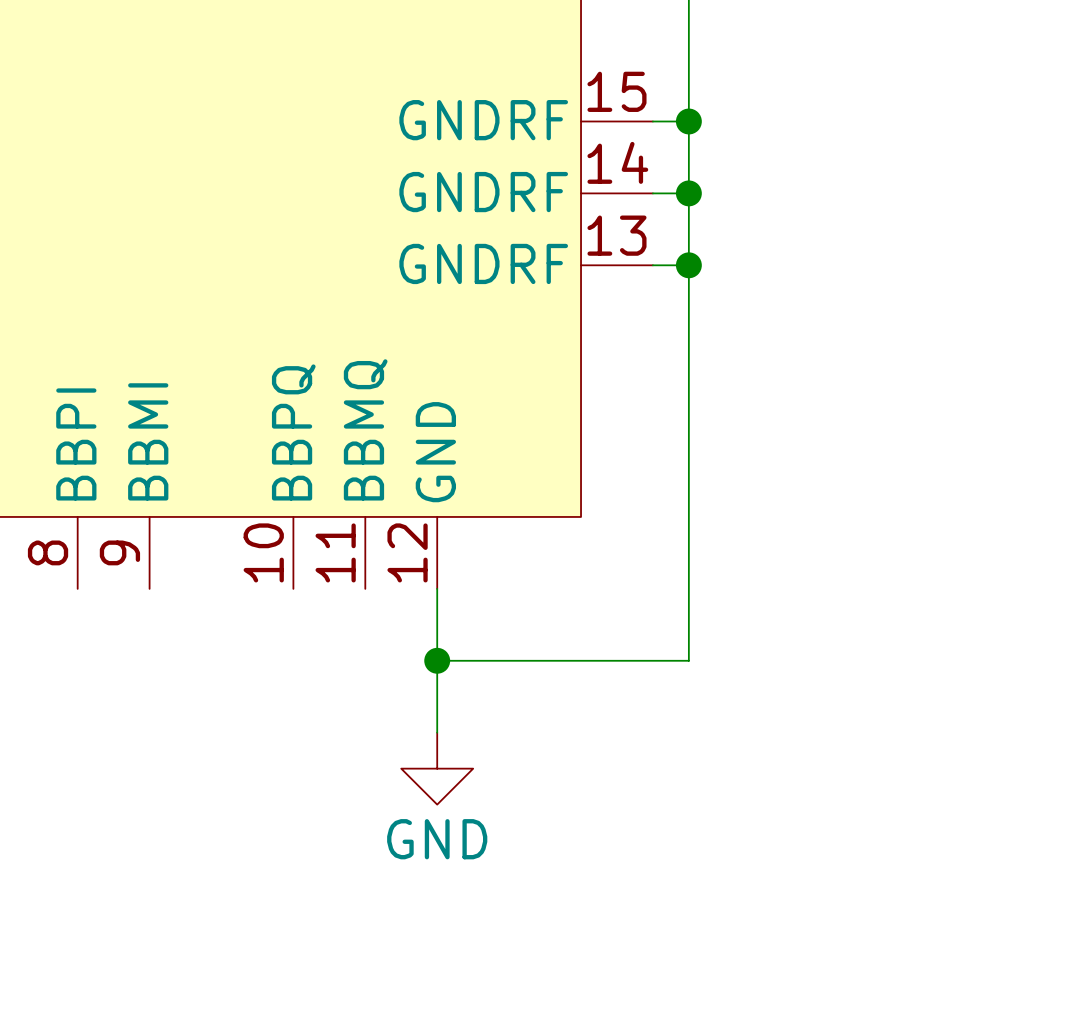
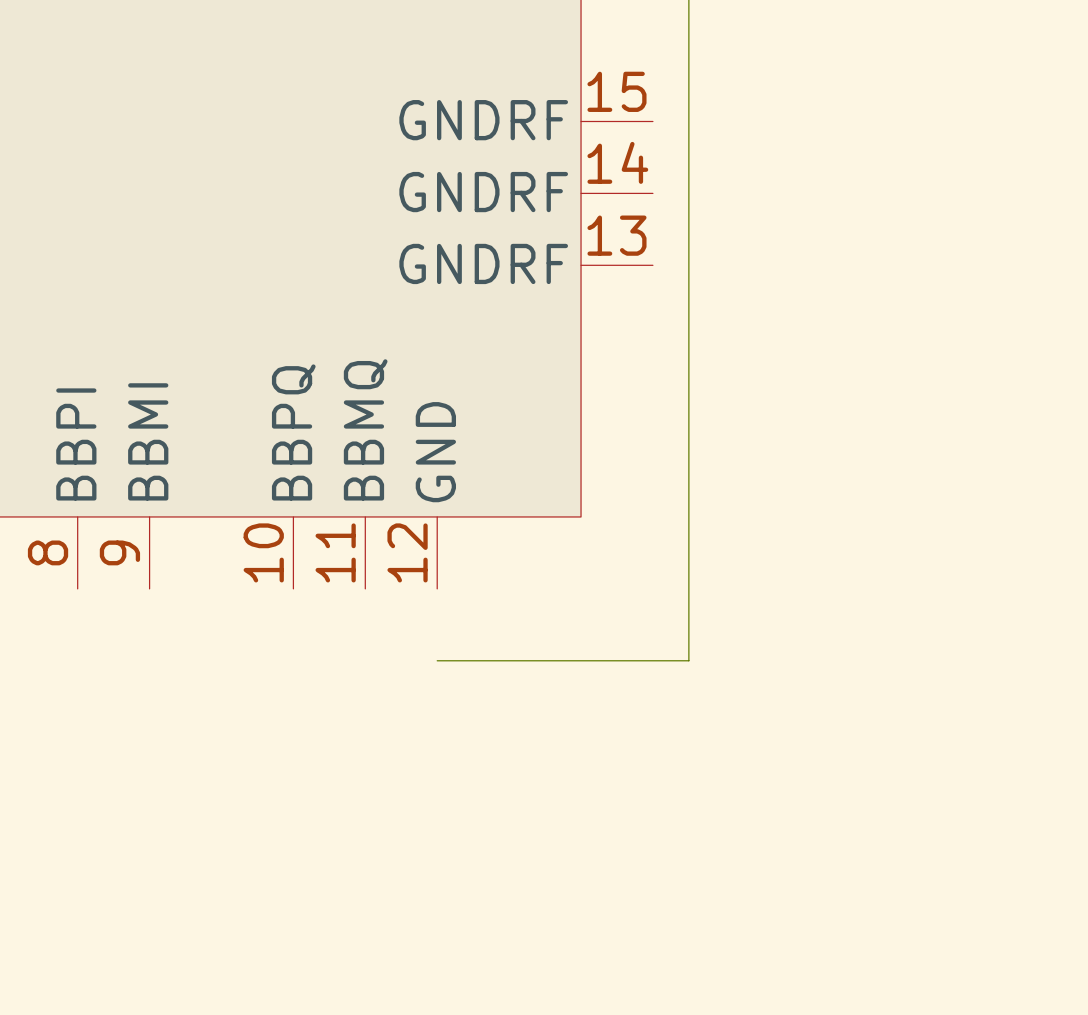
wire: (652, 121) (688, 121) -> none
junction: (688, 121) -> none
wire: (652, 193) (688, 193) -> none
junction: (688, 193) -> none
wire: (652, 265) (688, 265) -> none
junction: (688, 265) -> none
wire: (437, 588) (437, 732) -> none
junction: (437, 660) -> none
power symbol: GND (437, 768) -> none

